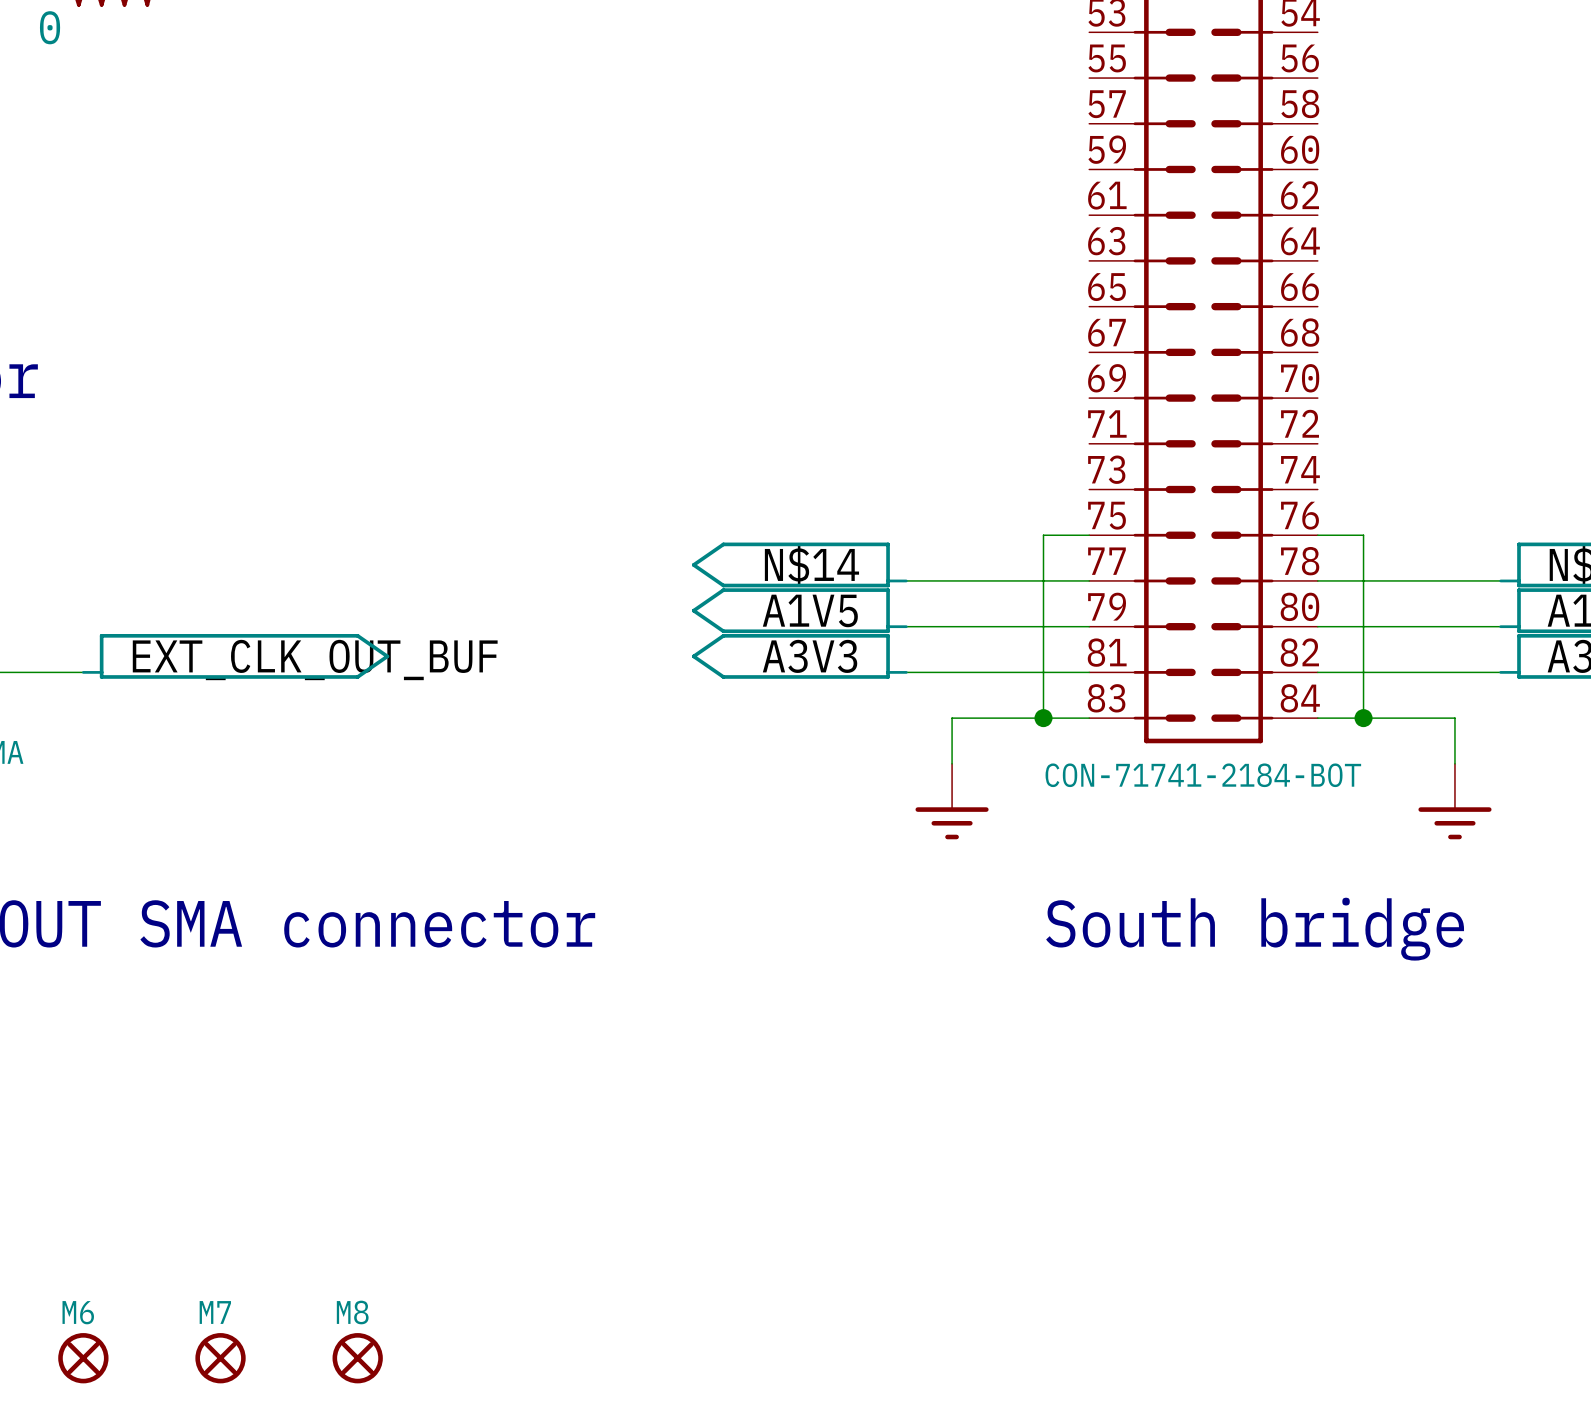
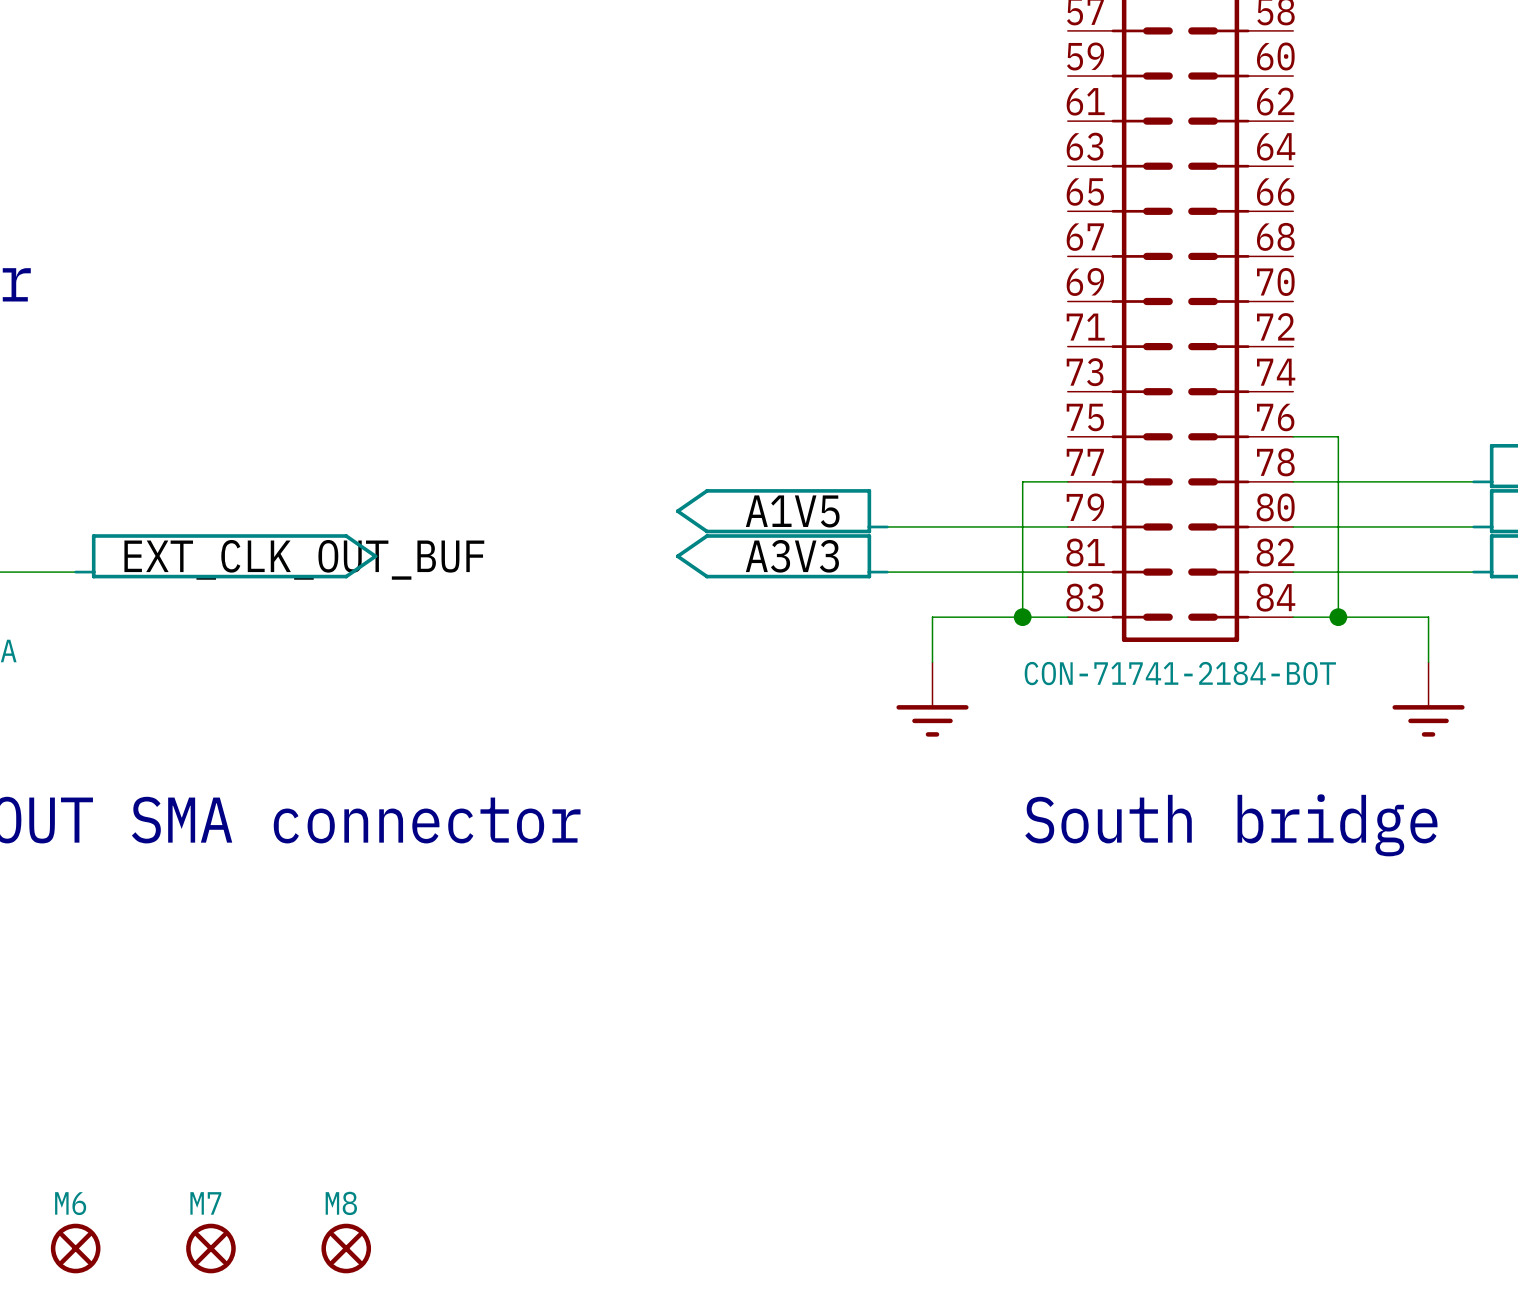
wire: (1089, 535) (1043, 535) (1043, 580) (906, 580) -> none
part: (799, 564) -> none
label: N$14 (811, 564) -> none

